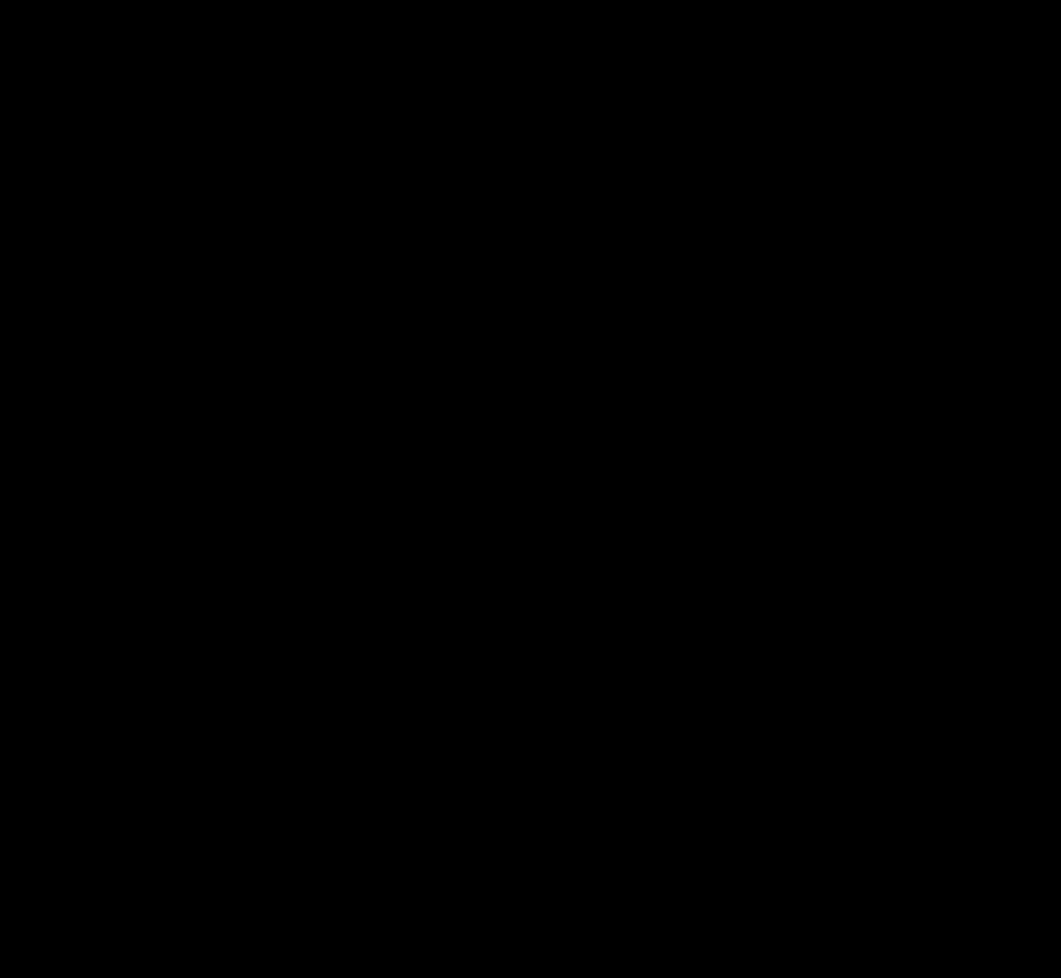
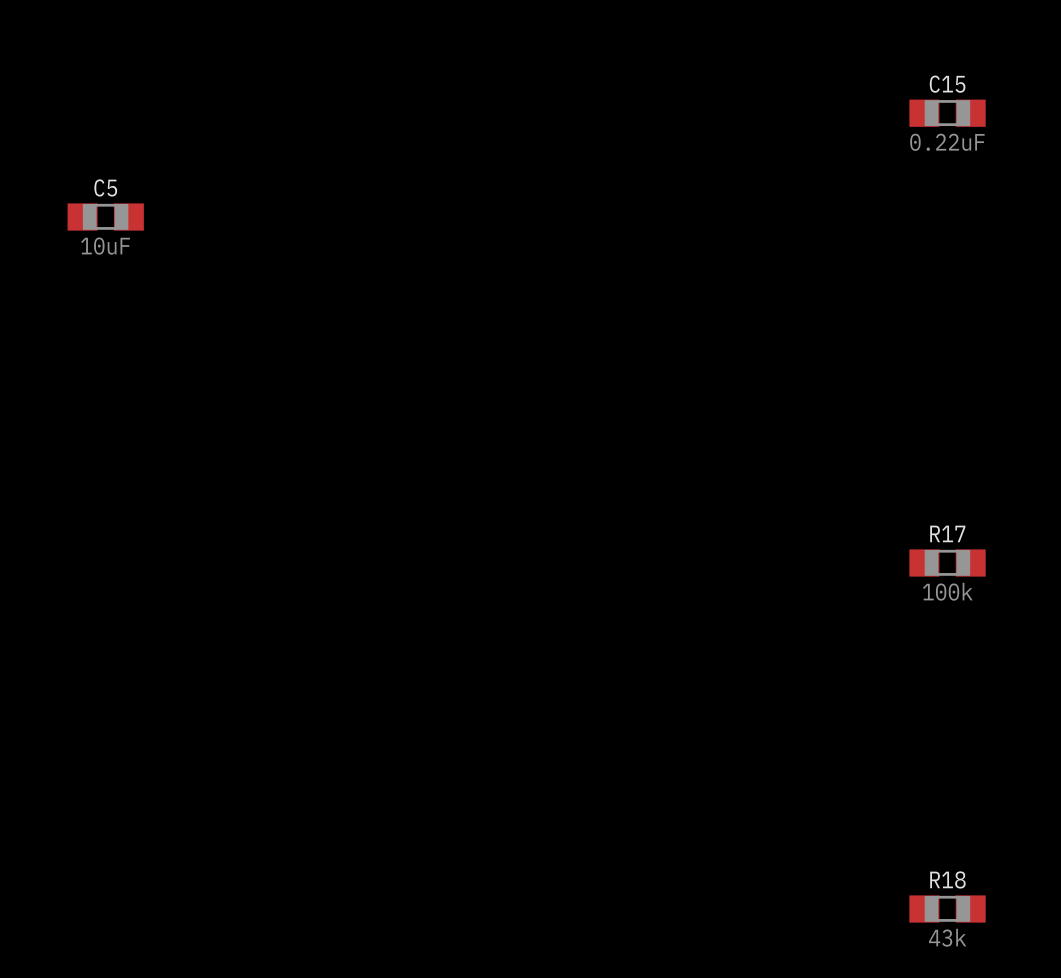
C15: none -> 0.22uF (947, 113)
C5: none -> 10uF (105, 217)
R17: none -> 100k (947, 563)
R18: none -> 43k (947, 909)

